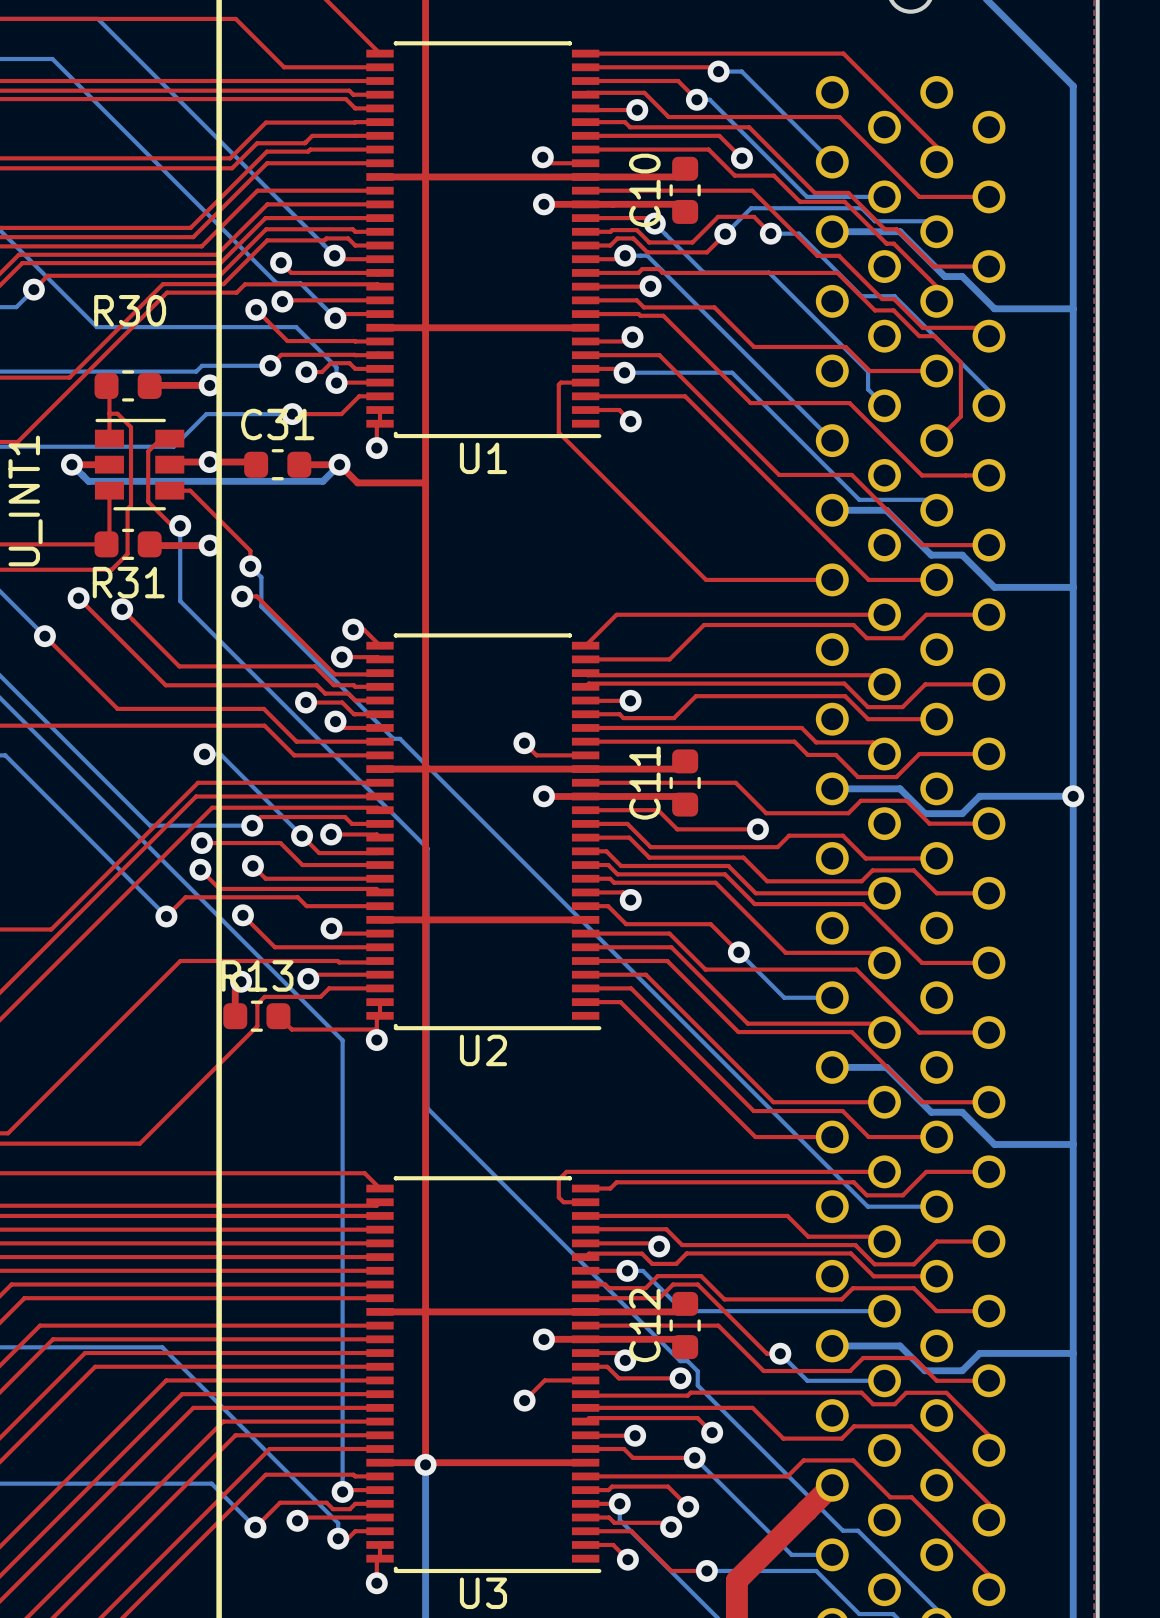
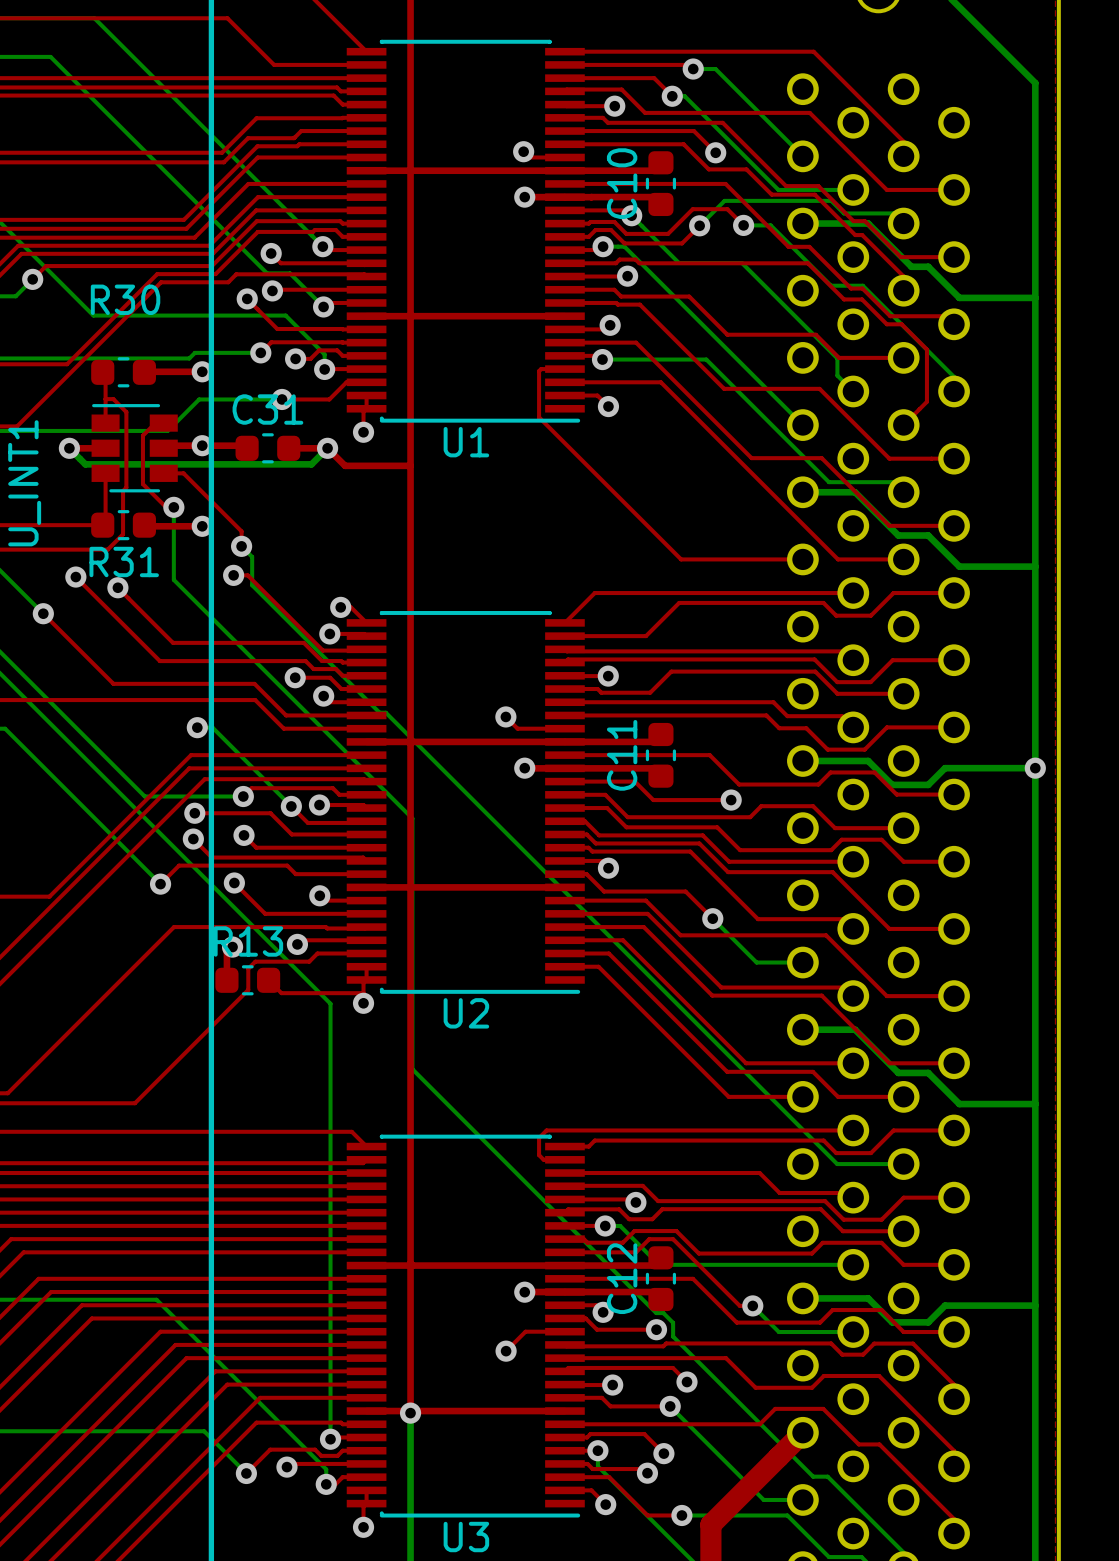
U1 footprint: [366, 41, 602, 439] -> [346, 39, 585, 423]
U2 footprint: [366, 633, 602, 1031] -> [346, 610, 585, 994]
U3 footprint: [366, 1176, 602, 1574] -> [346, 1134, 585, 1518]

